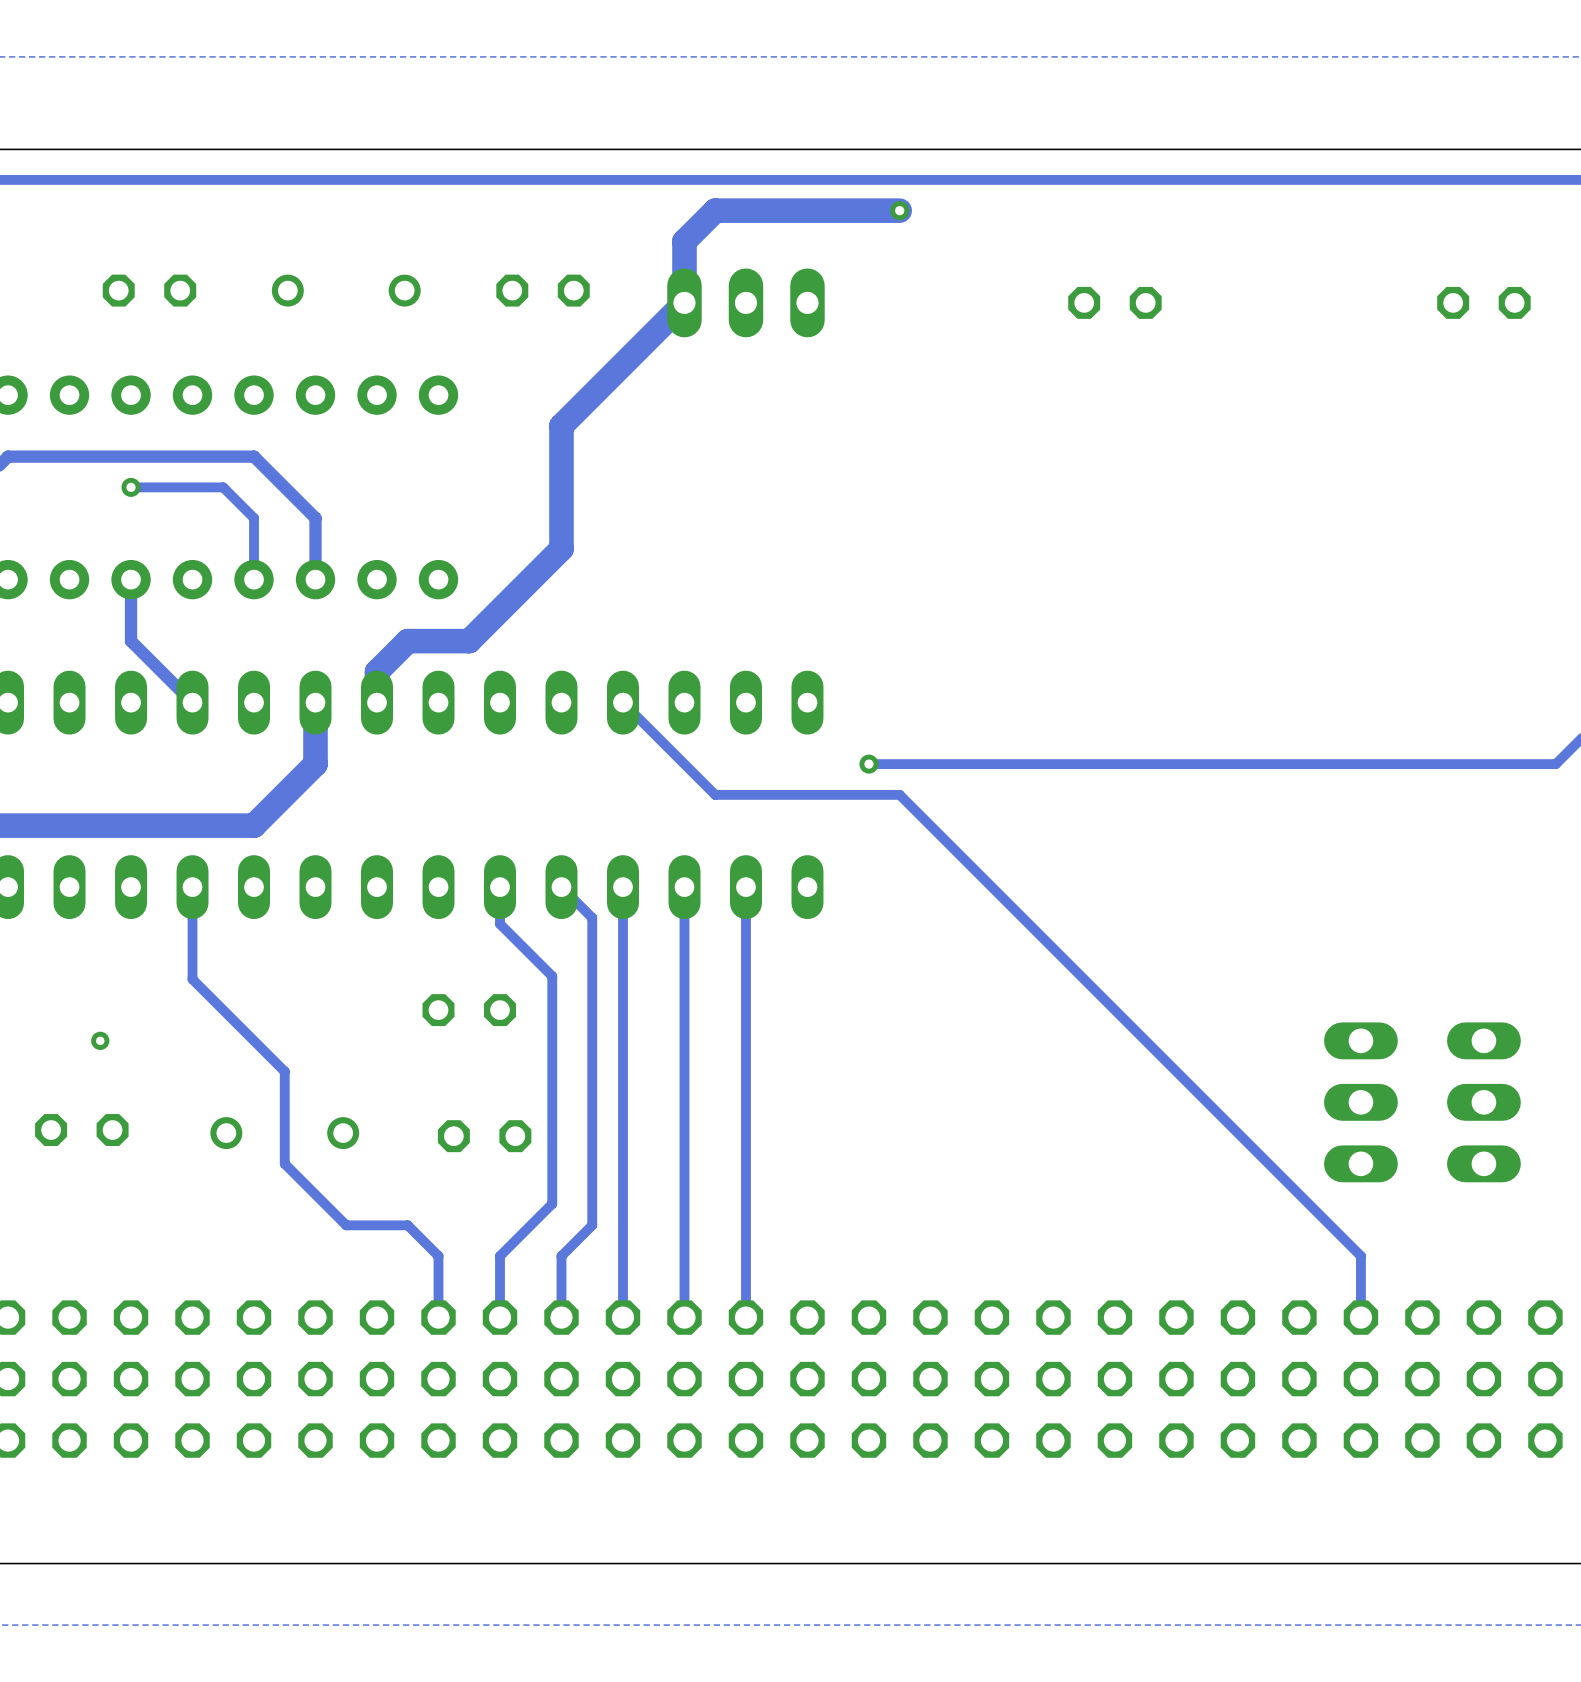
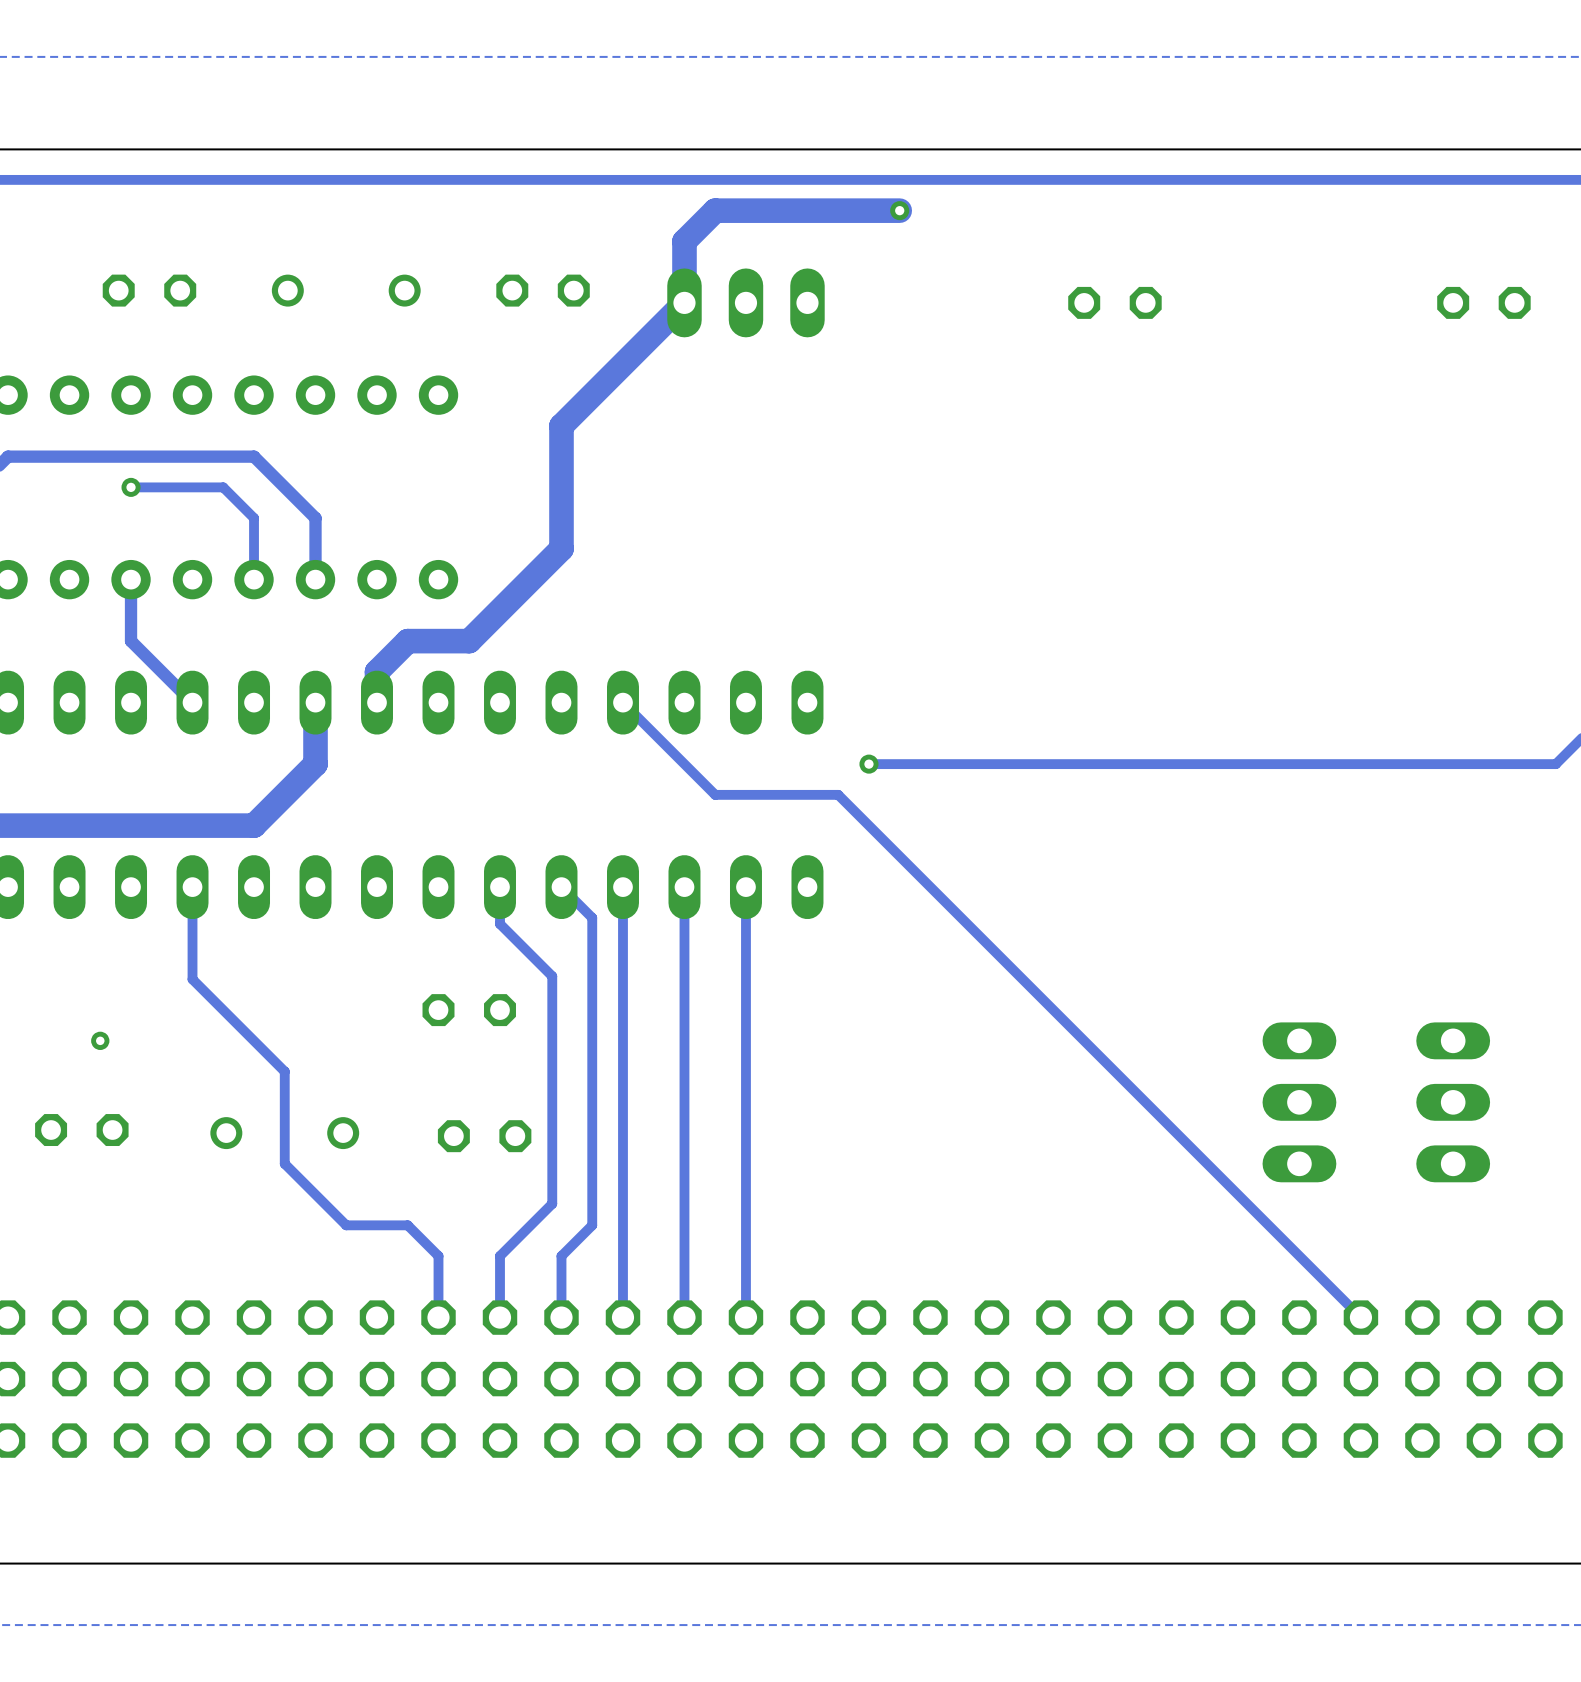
track: (838, 794) (899, 794) (1360, 1256) (1360, 1317) -> (838, 794) (1360, 1317)
part: none -> (1299, 1102)
part: (1360, 1102) -> none
part position: (1483, 1102) -> (1453, 1102)

